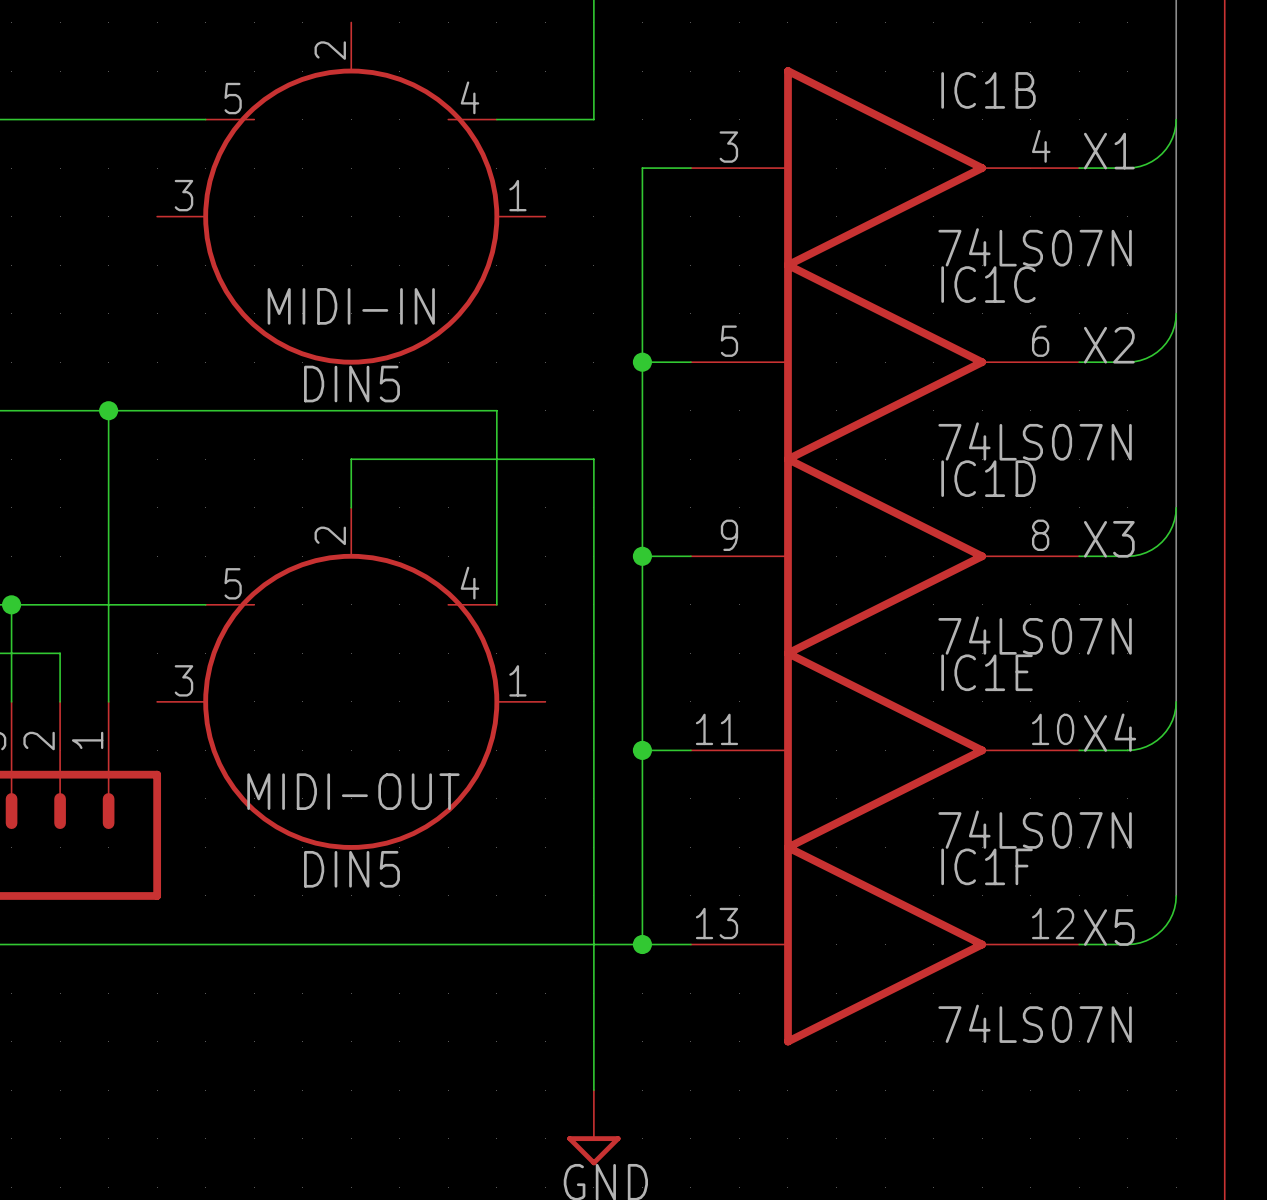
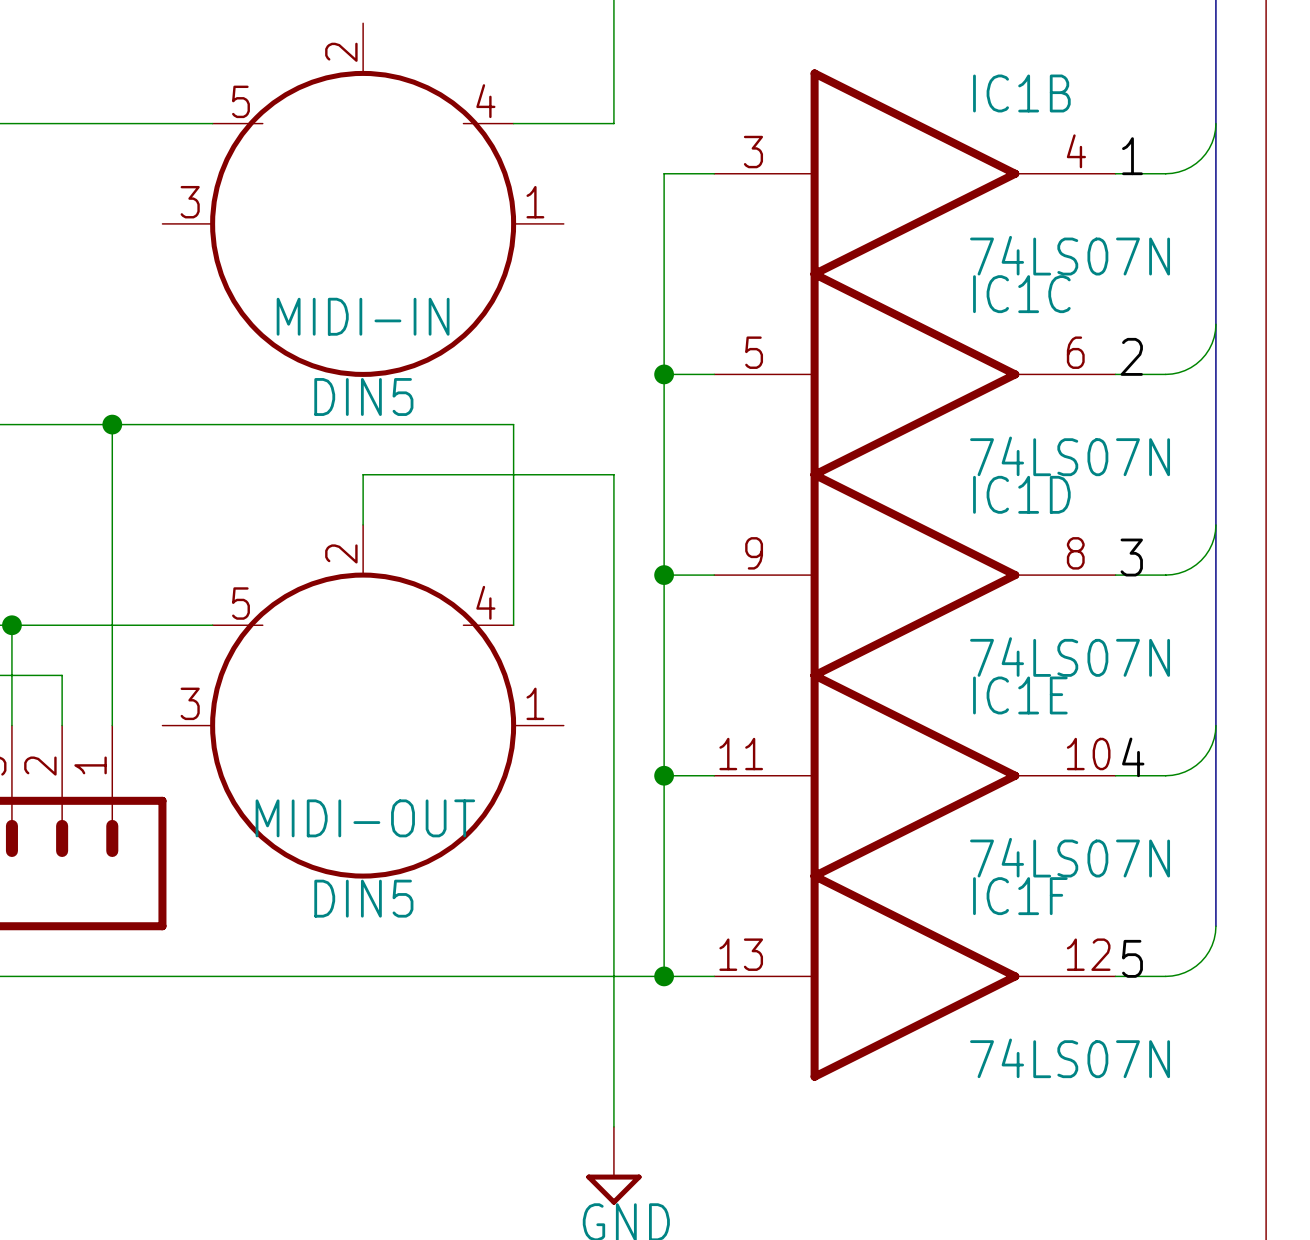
label: X1 (1109, 151) -> 1 (1132, 156)
label: X2 (1109, 345) -> 2 (1131, 356)
label: X3 (1109, 539) -> 3 (1131, 557)
label: X4 (1110, 732) -> 4 (1133, 757)
label: X5 (1109, 927) -> 5 (1132, 958)

